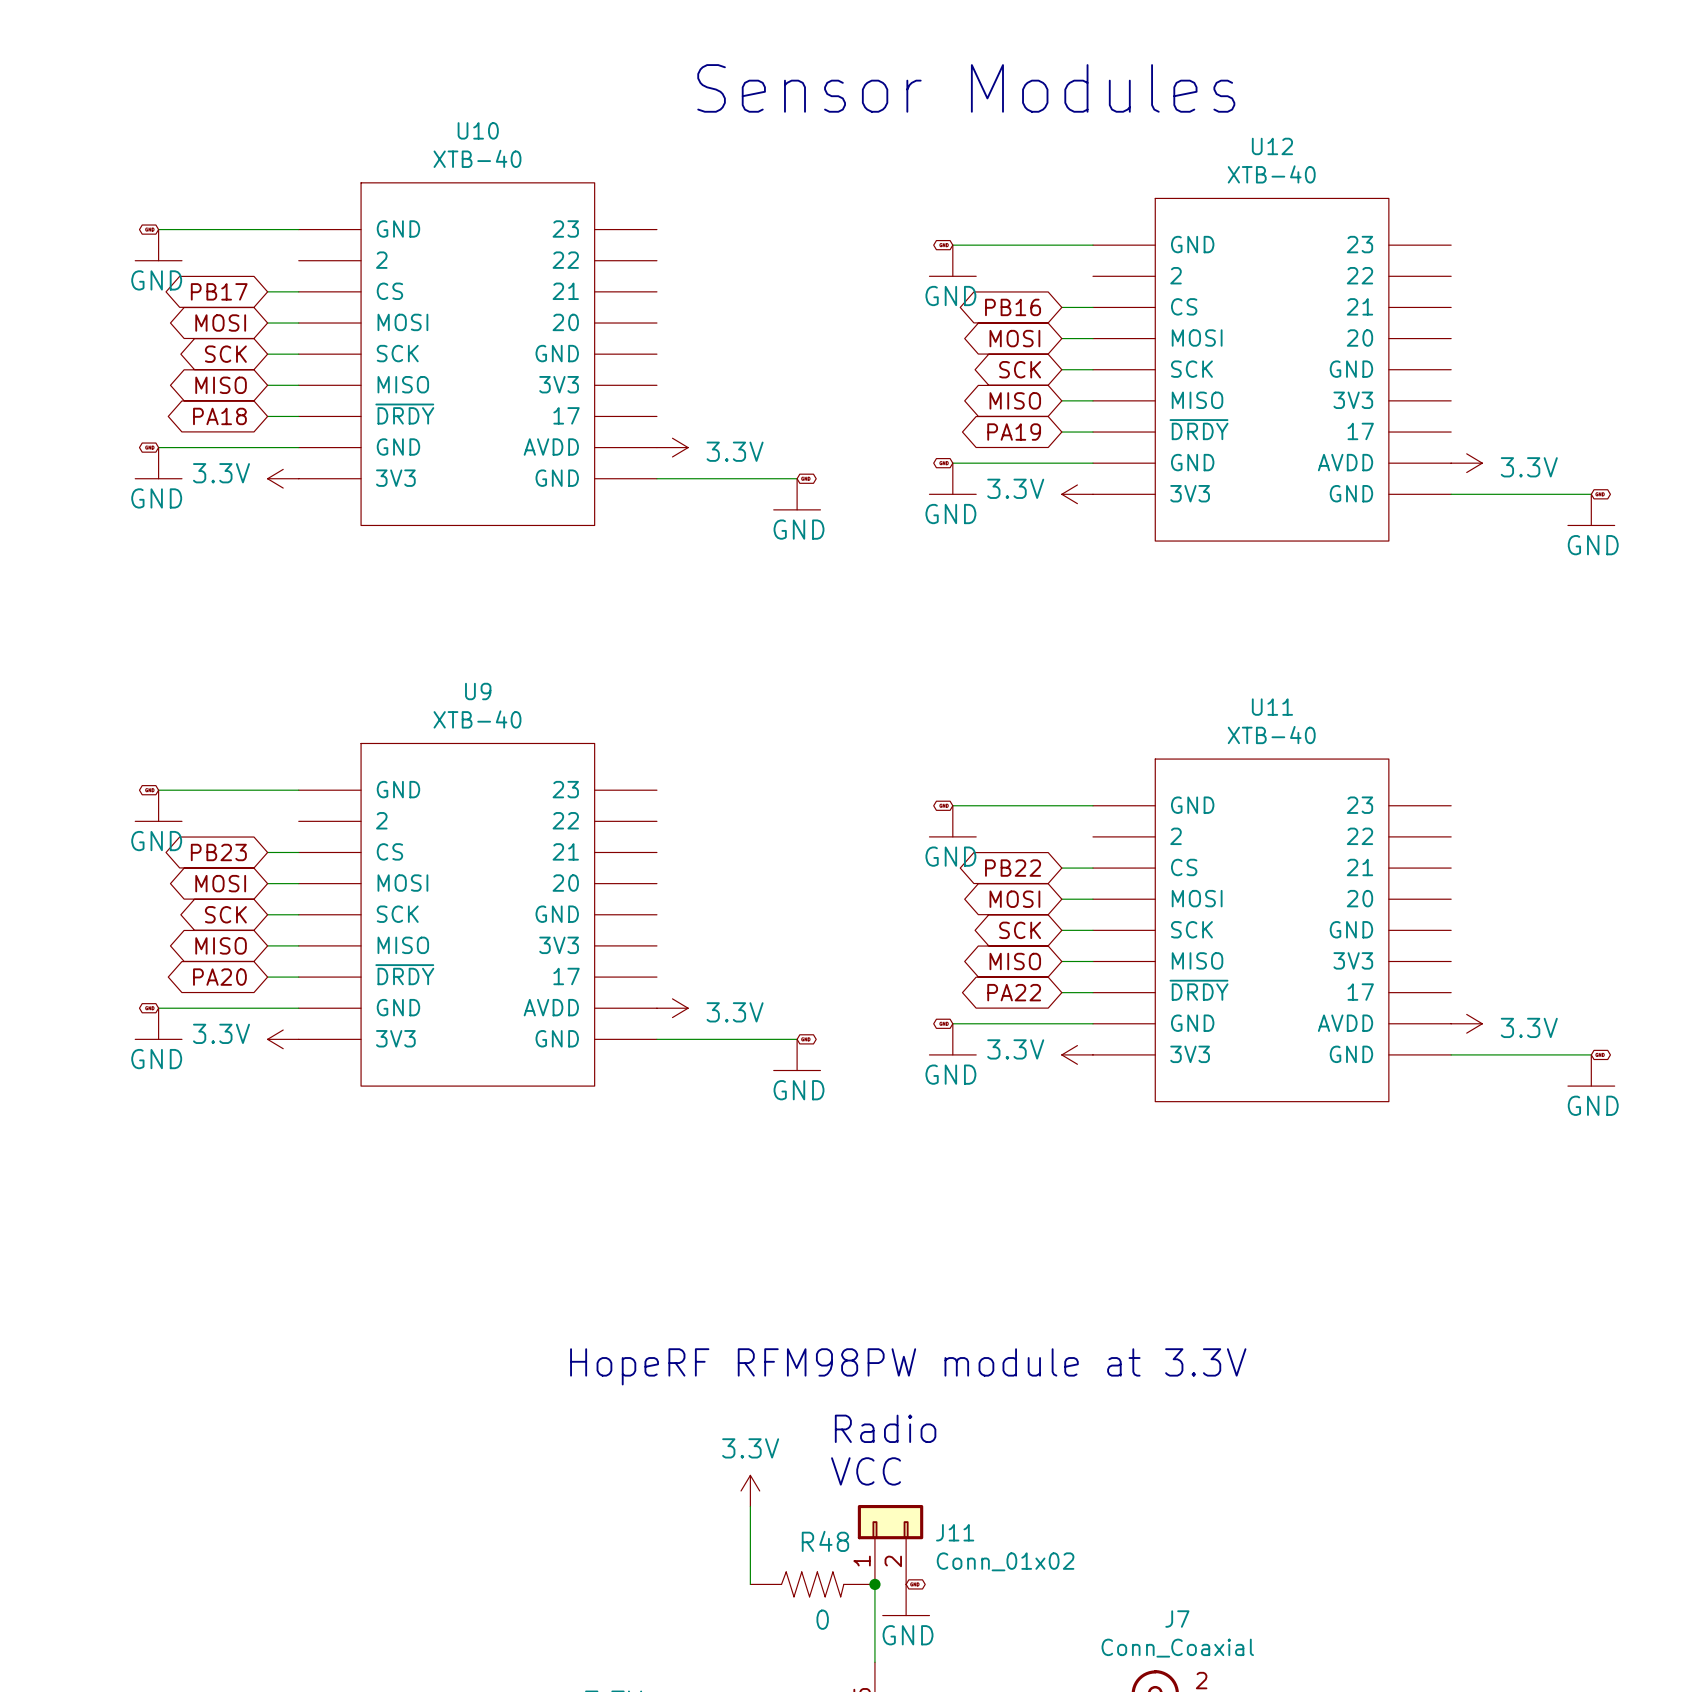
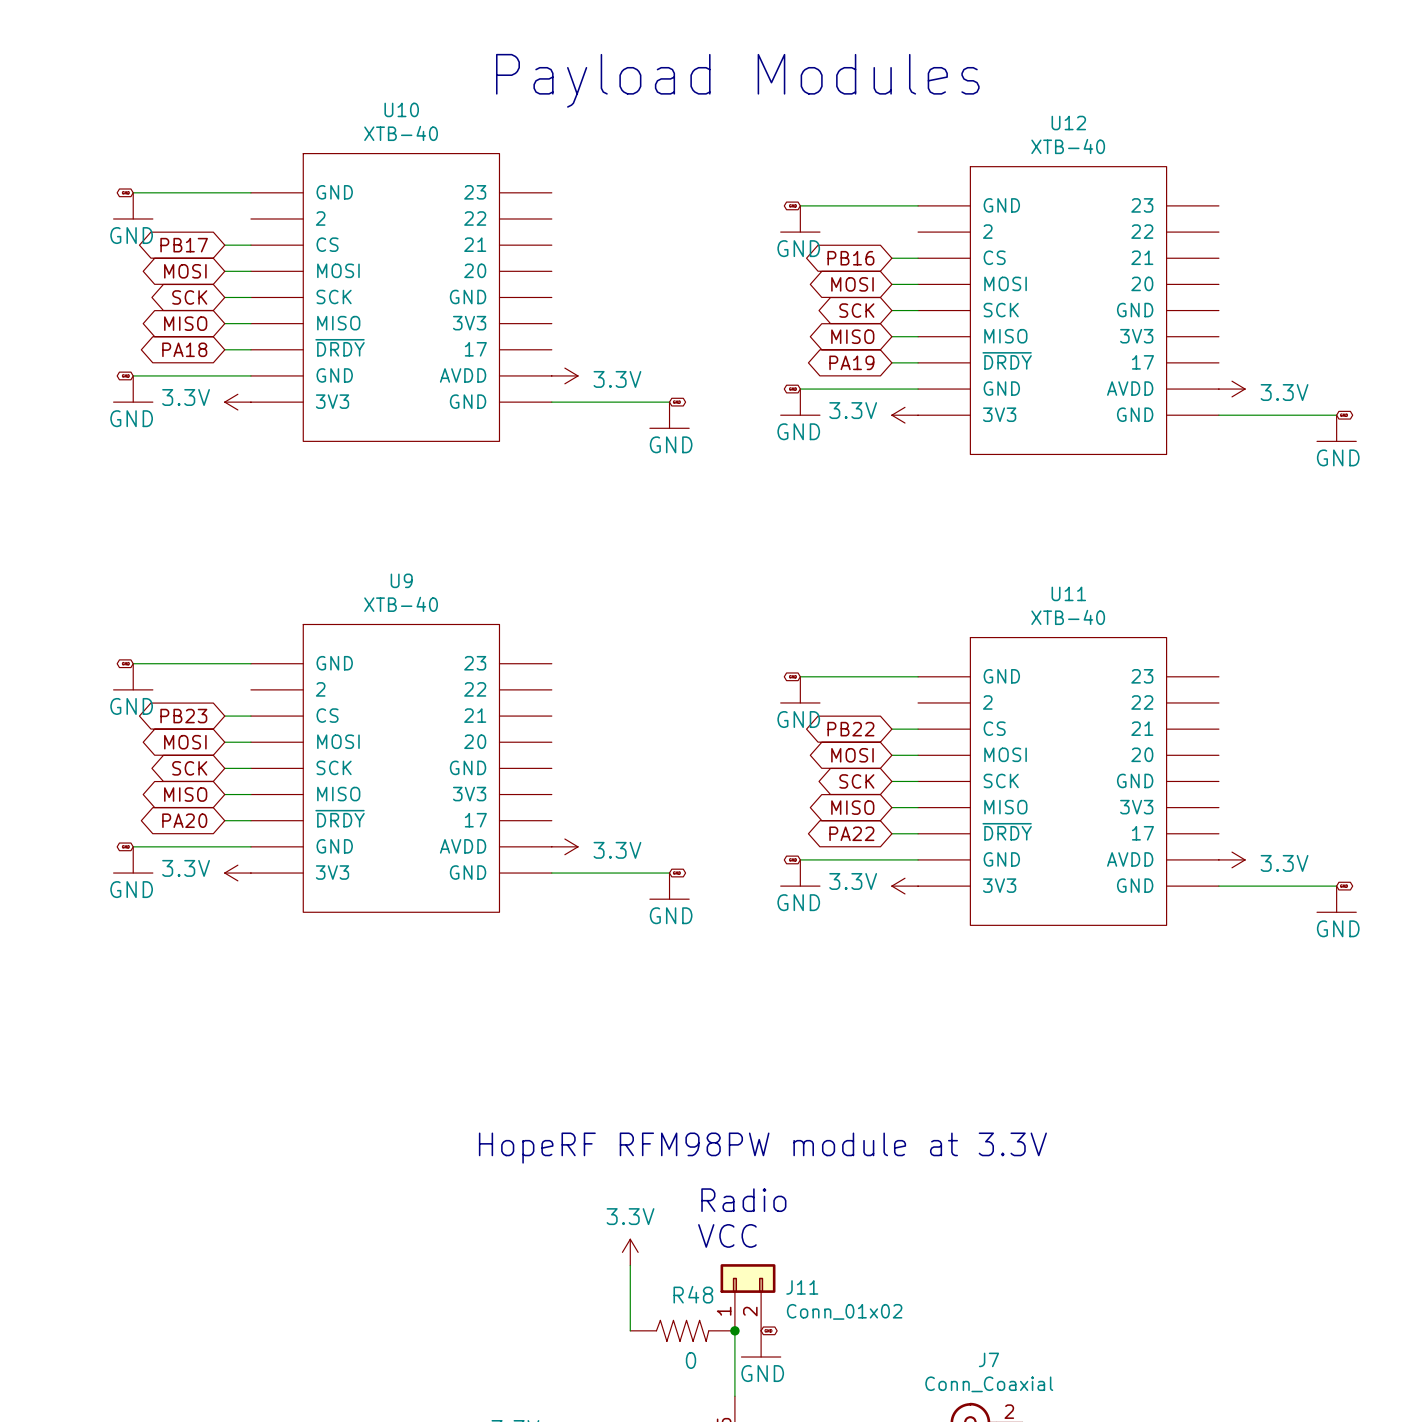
text: Sensor Modules (966, 88) -> Payload Modules (737, 80)

